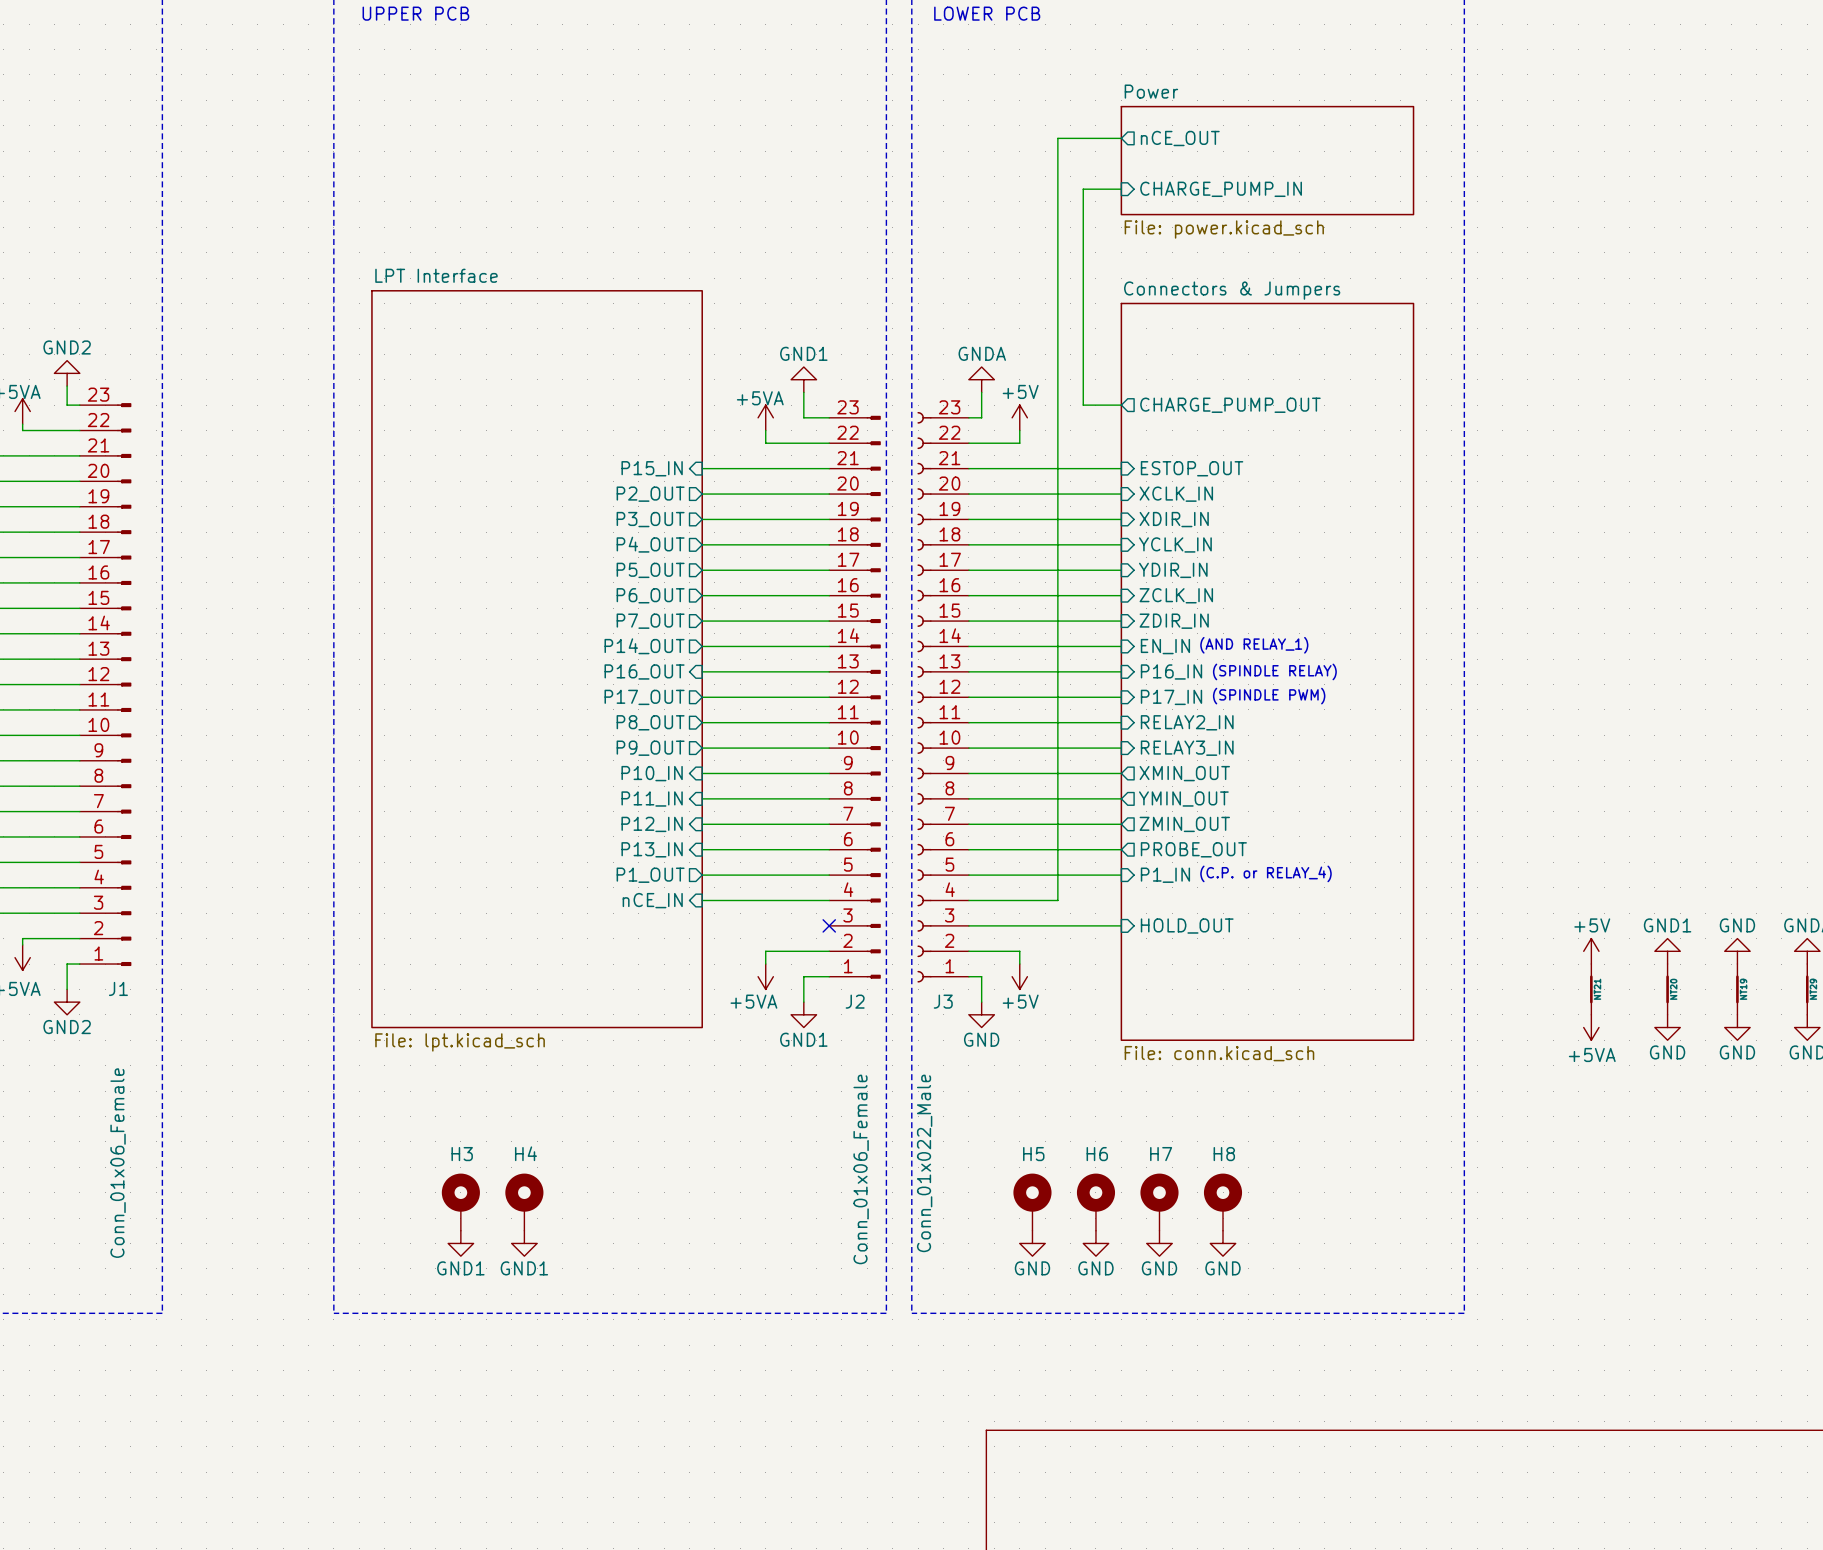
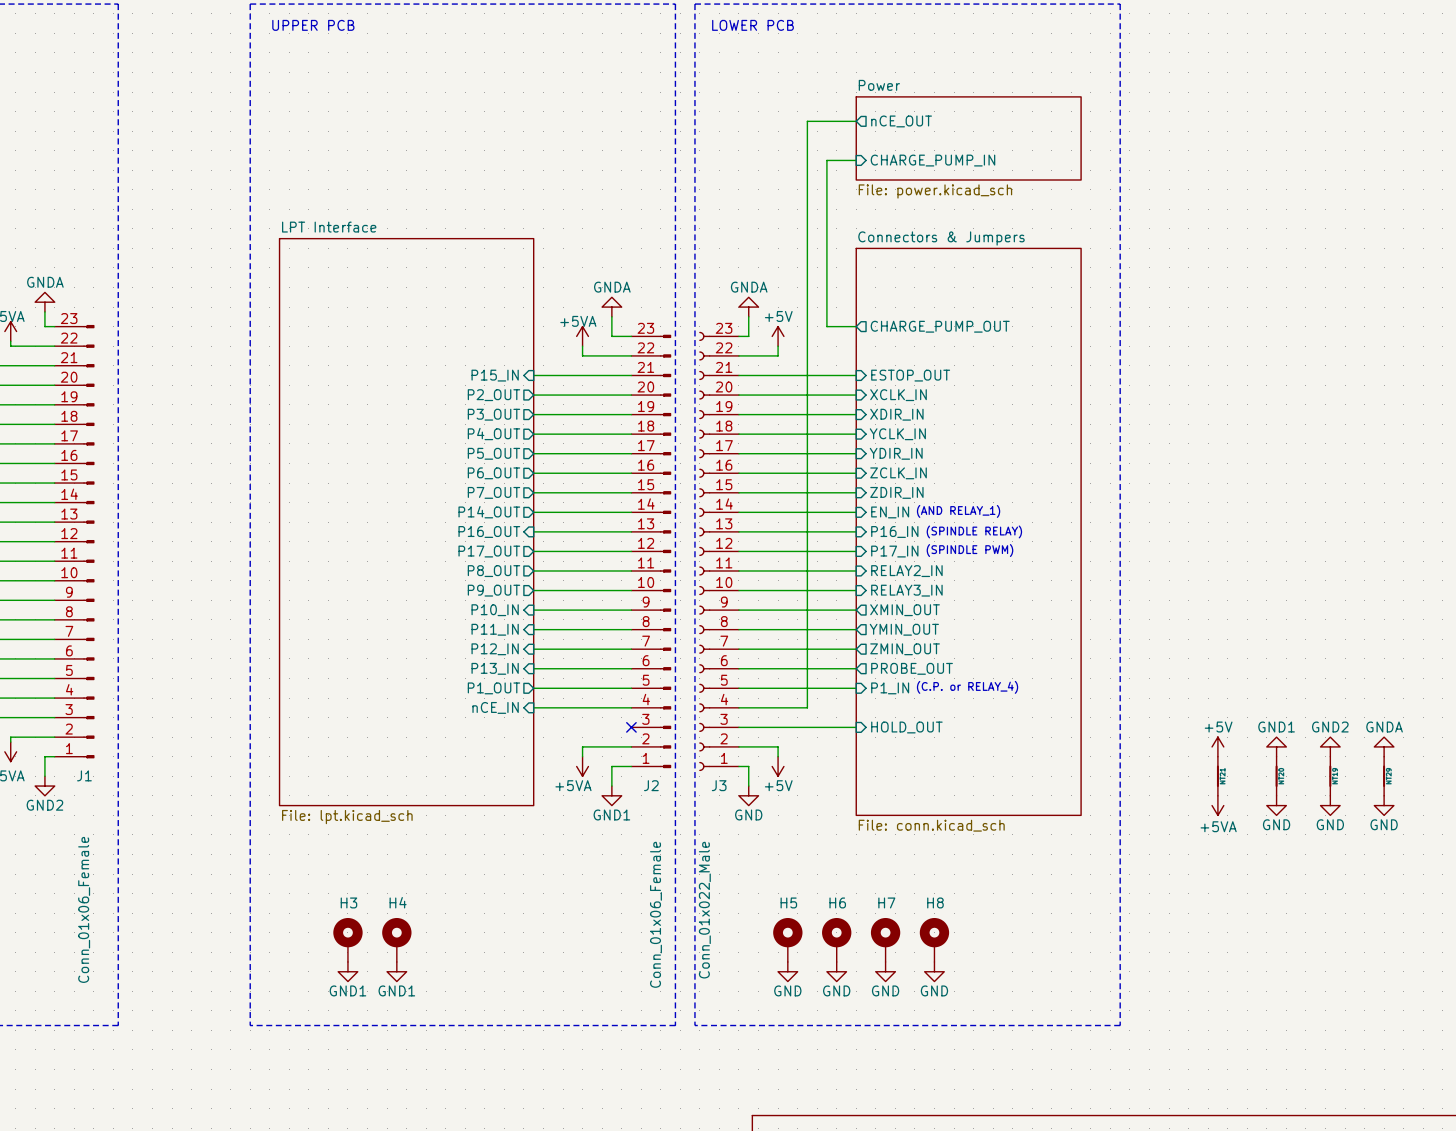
power symbol: GND2 (67, 373) -> GNDA (44, 302)
power symbol: GND1 (803, 379) -> GNDA (611, 307)
power symbol: GND (1737, 951) -> GND2 (1330, 746)

